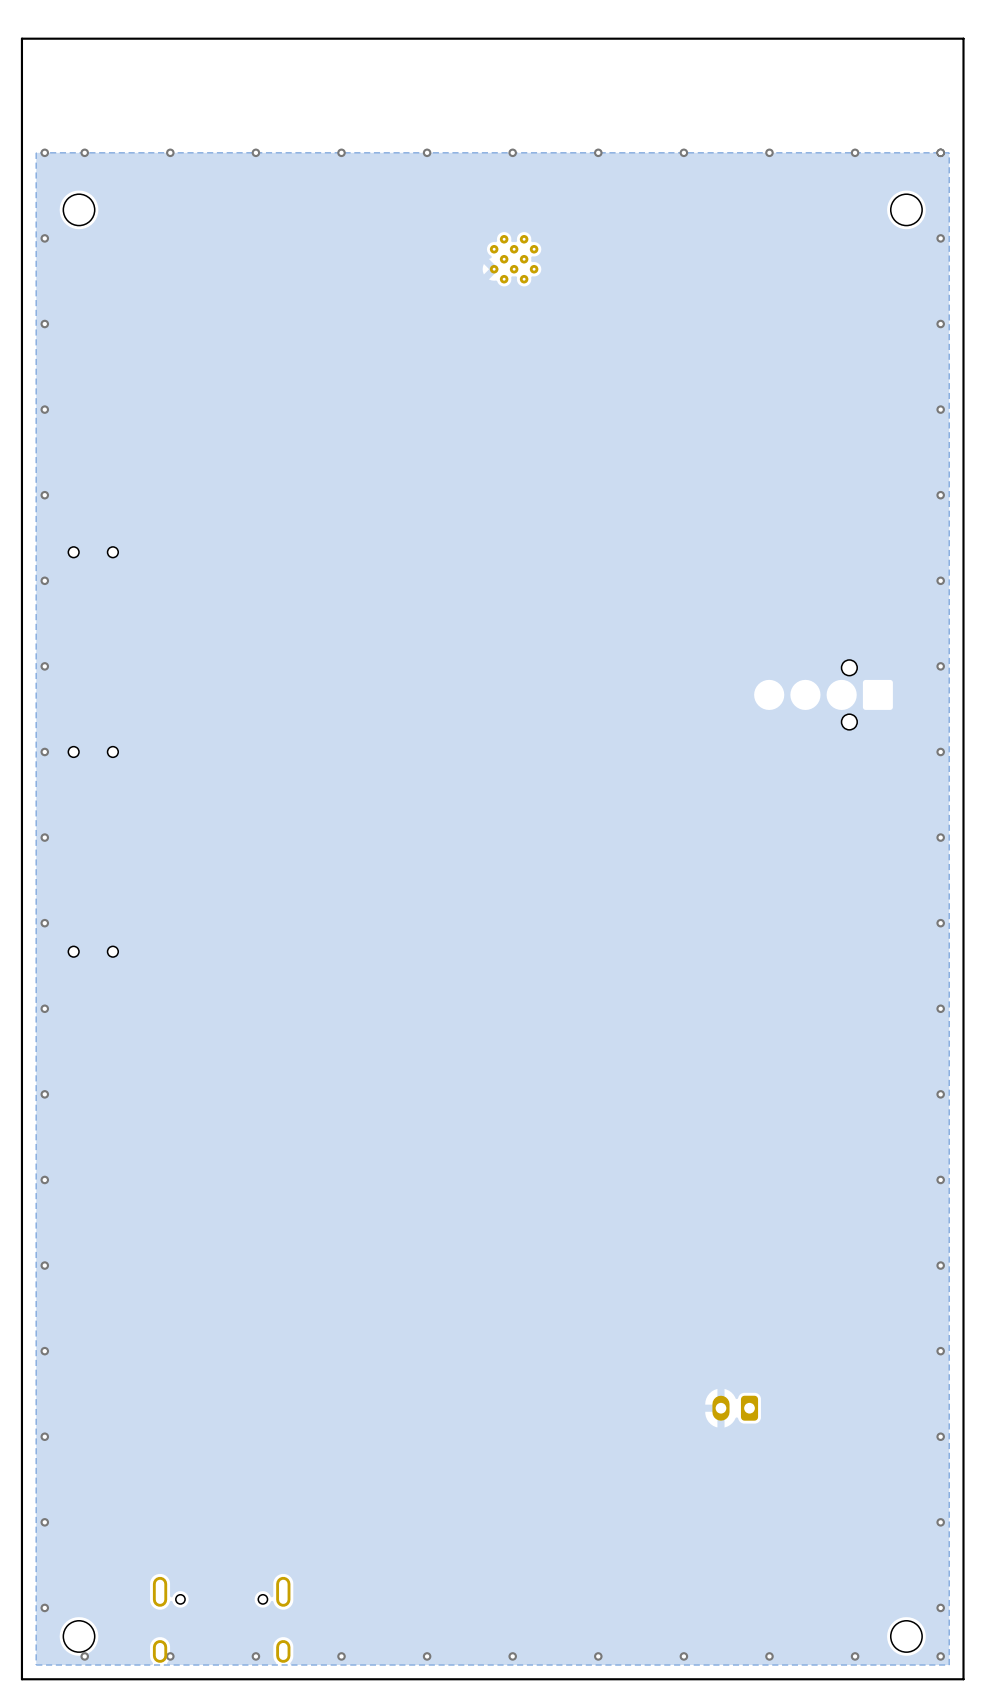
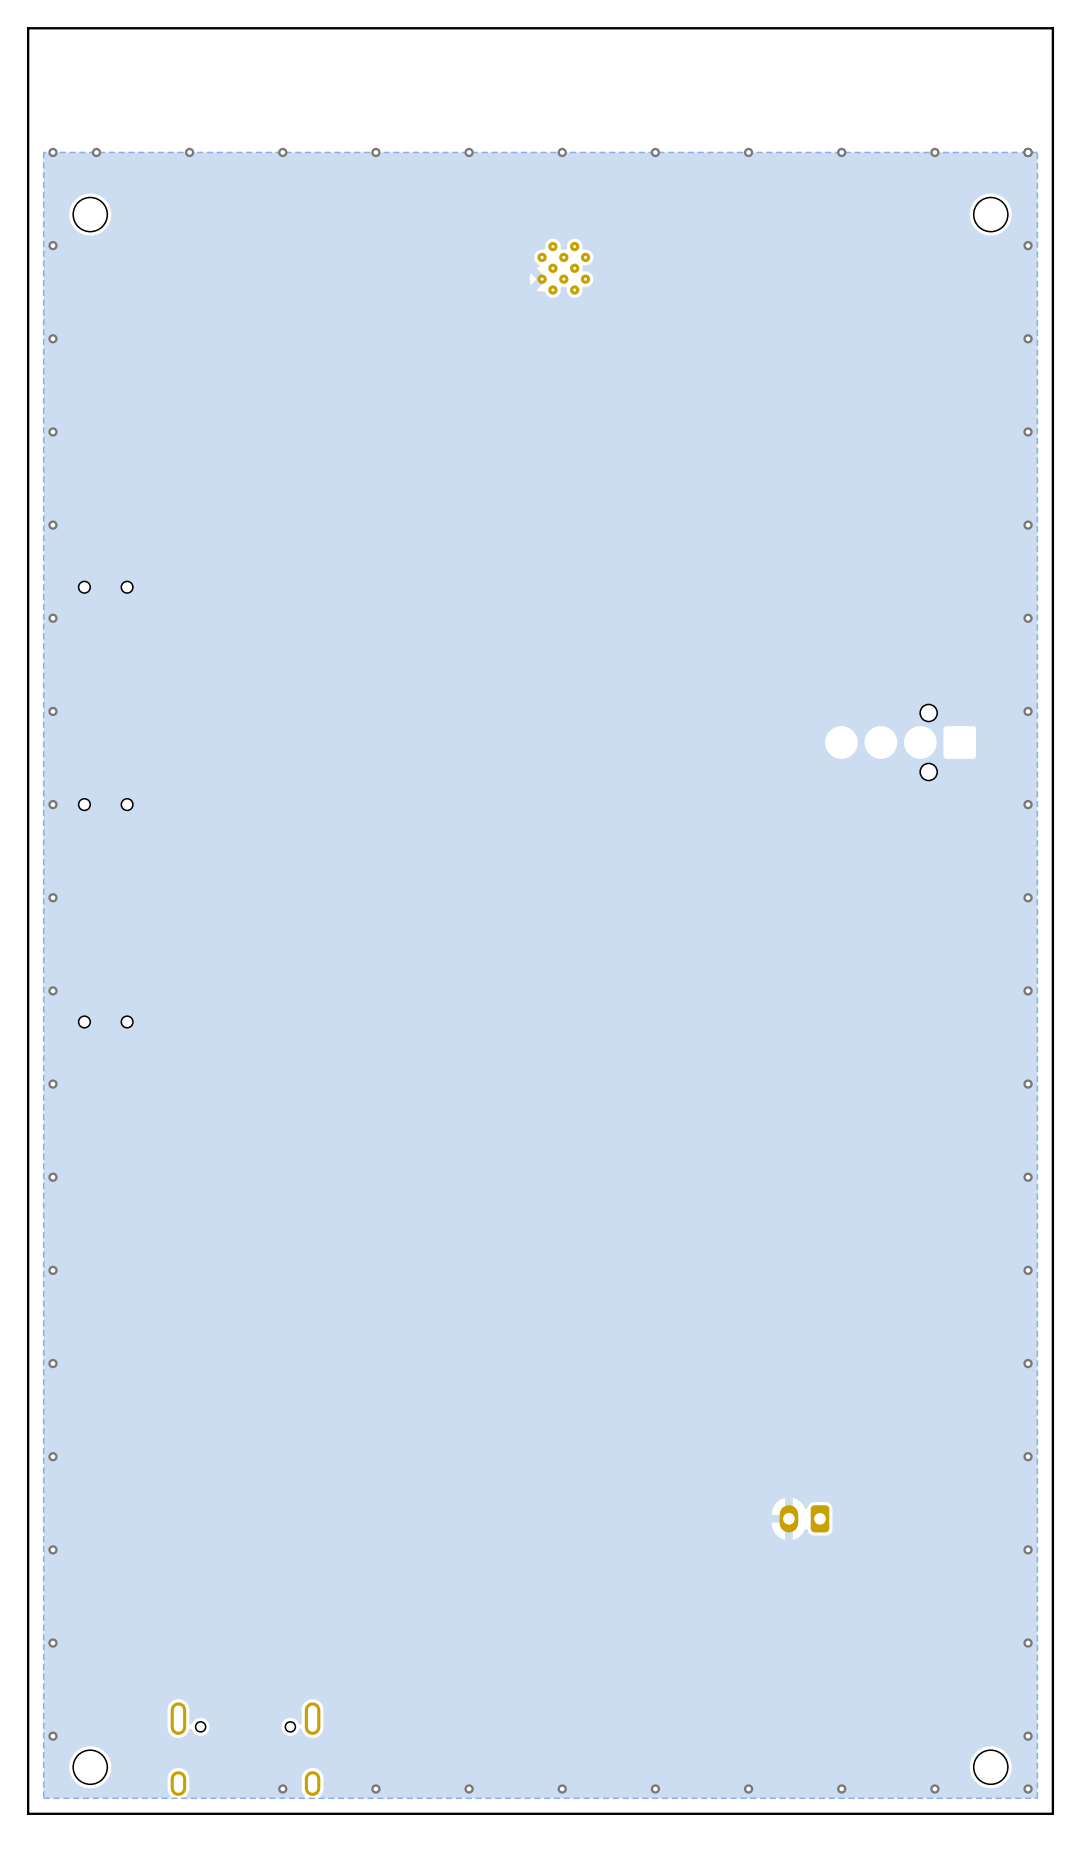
via: (84, 1656) -> none
via: (170, 1656) -> none

